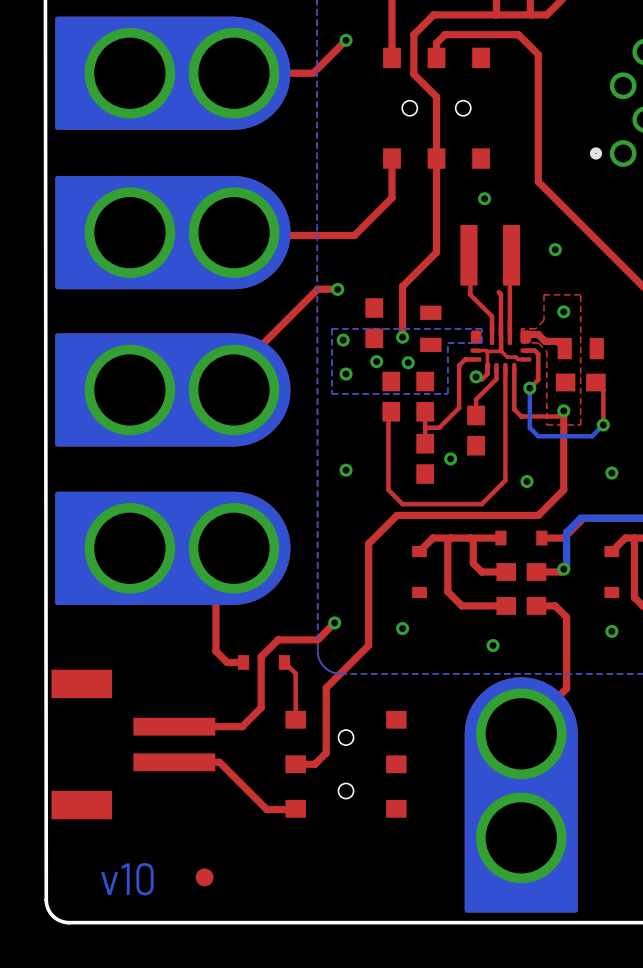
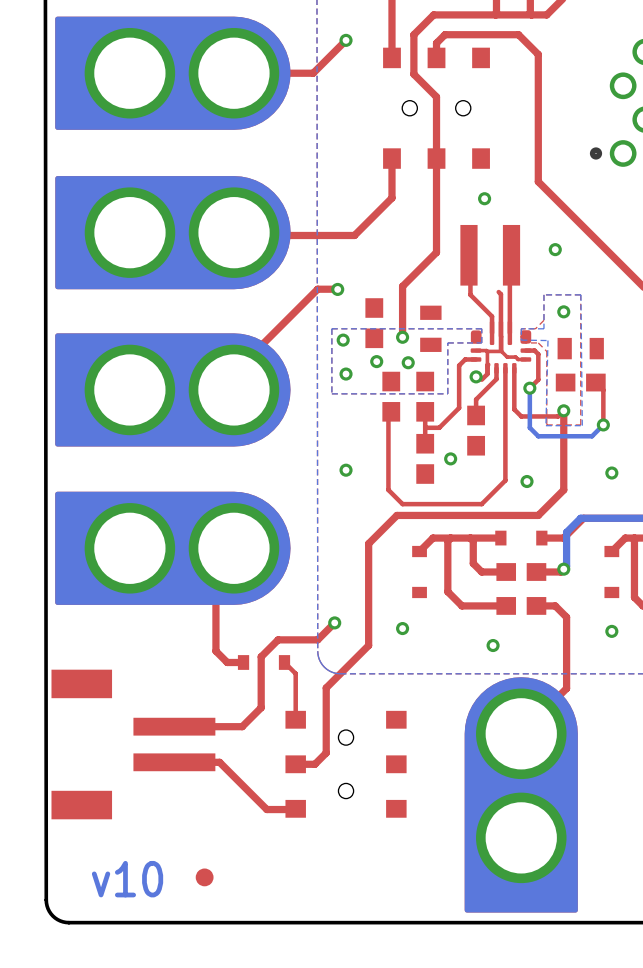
bottom zone outline: none -> (580, 294) (543, 294) (543, 328) (521, 328) (521, 340) (547, 340) (545, 425) (582, 425) (580, 294)
top track: (525, 333) (525, 336) (527, 334) (538, 334) (545, 341) (557, 341) (564, 348) -> none

